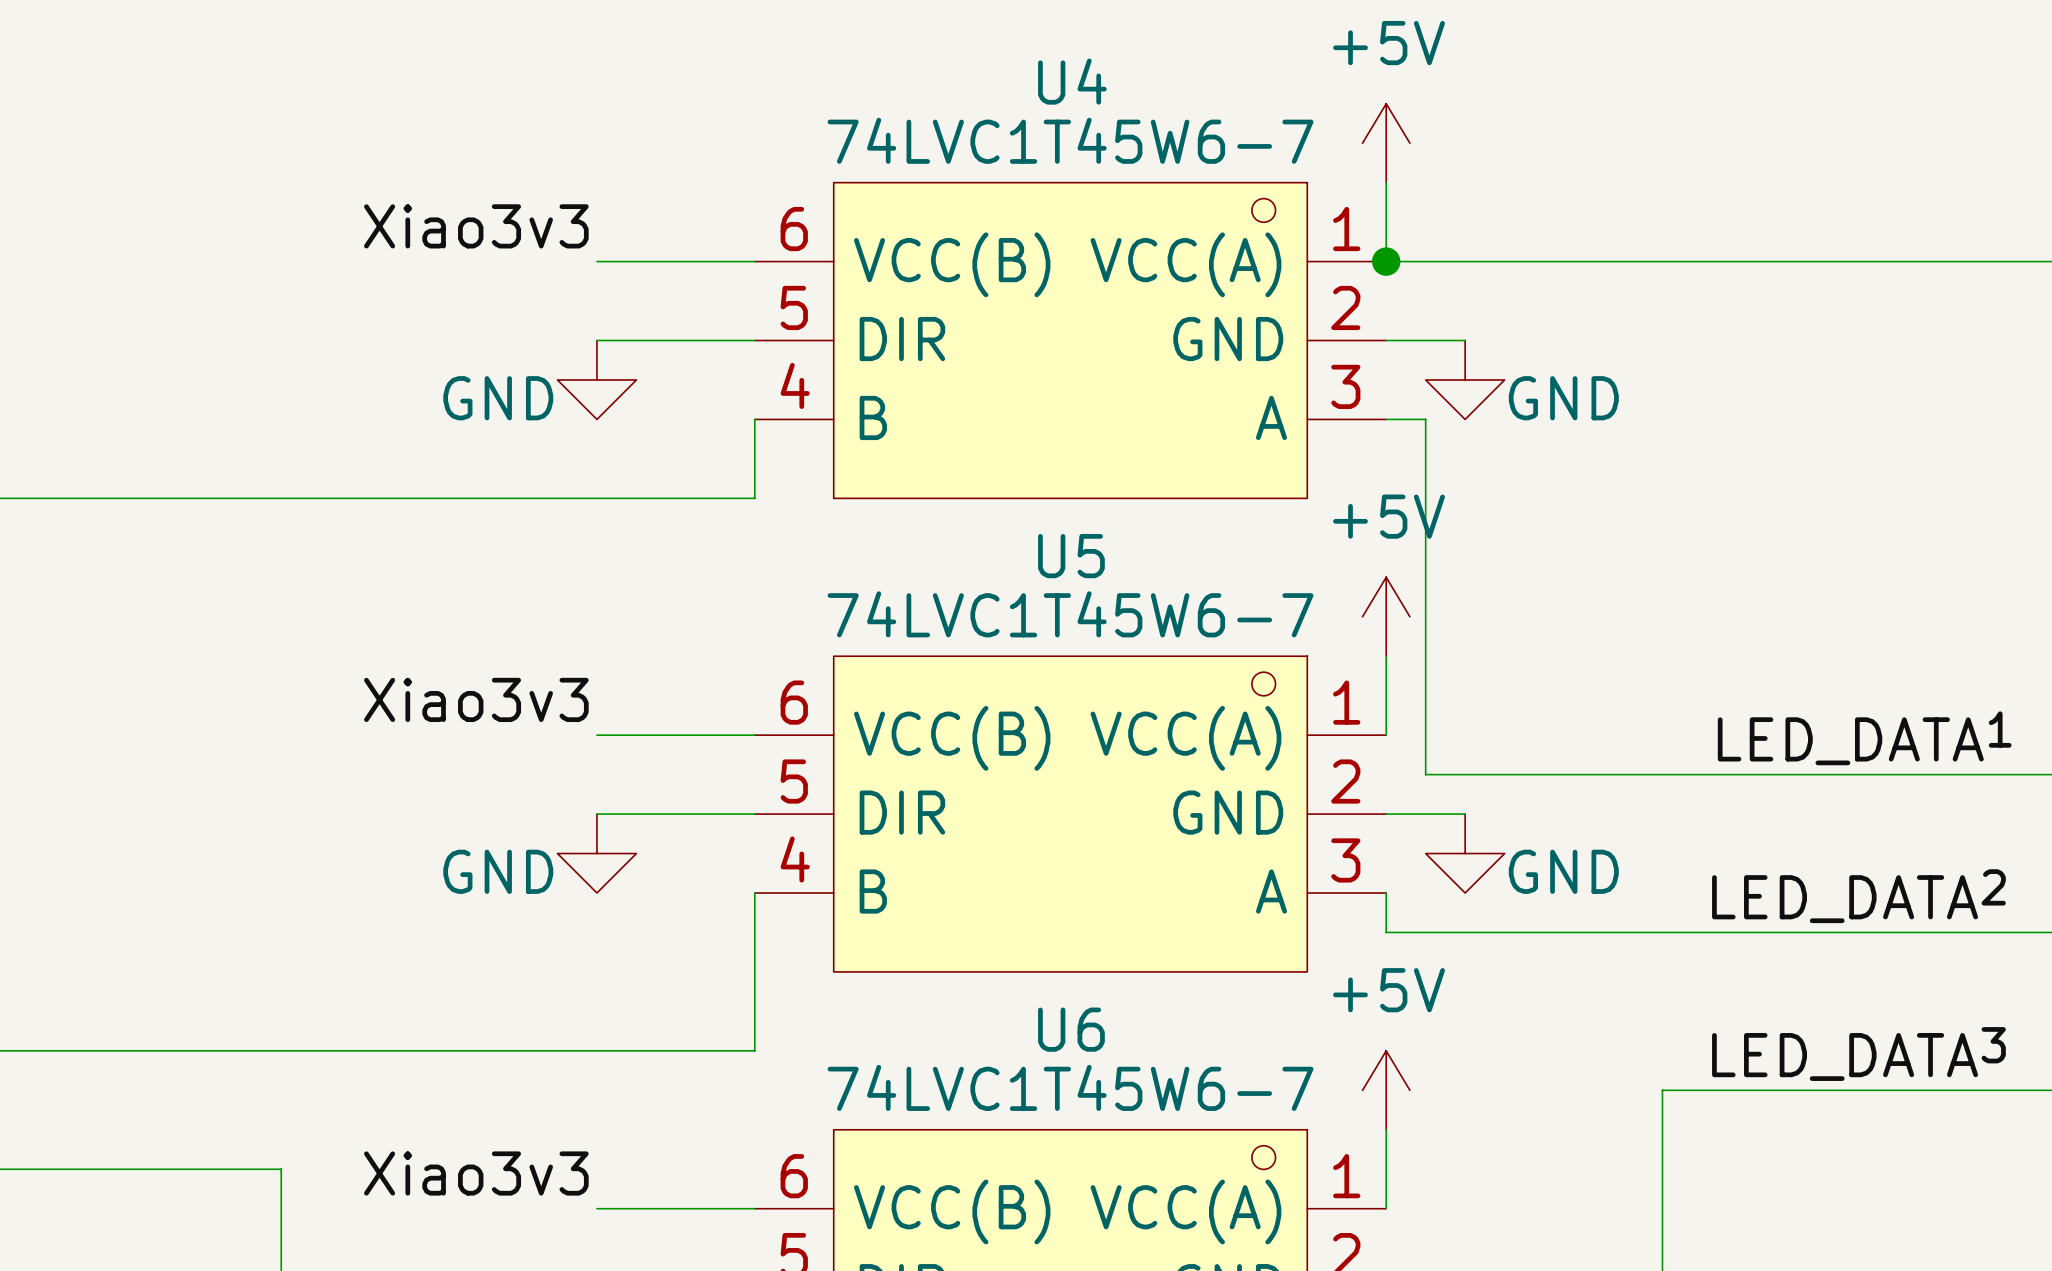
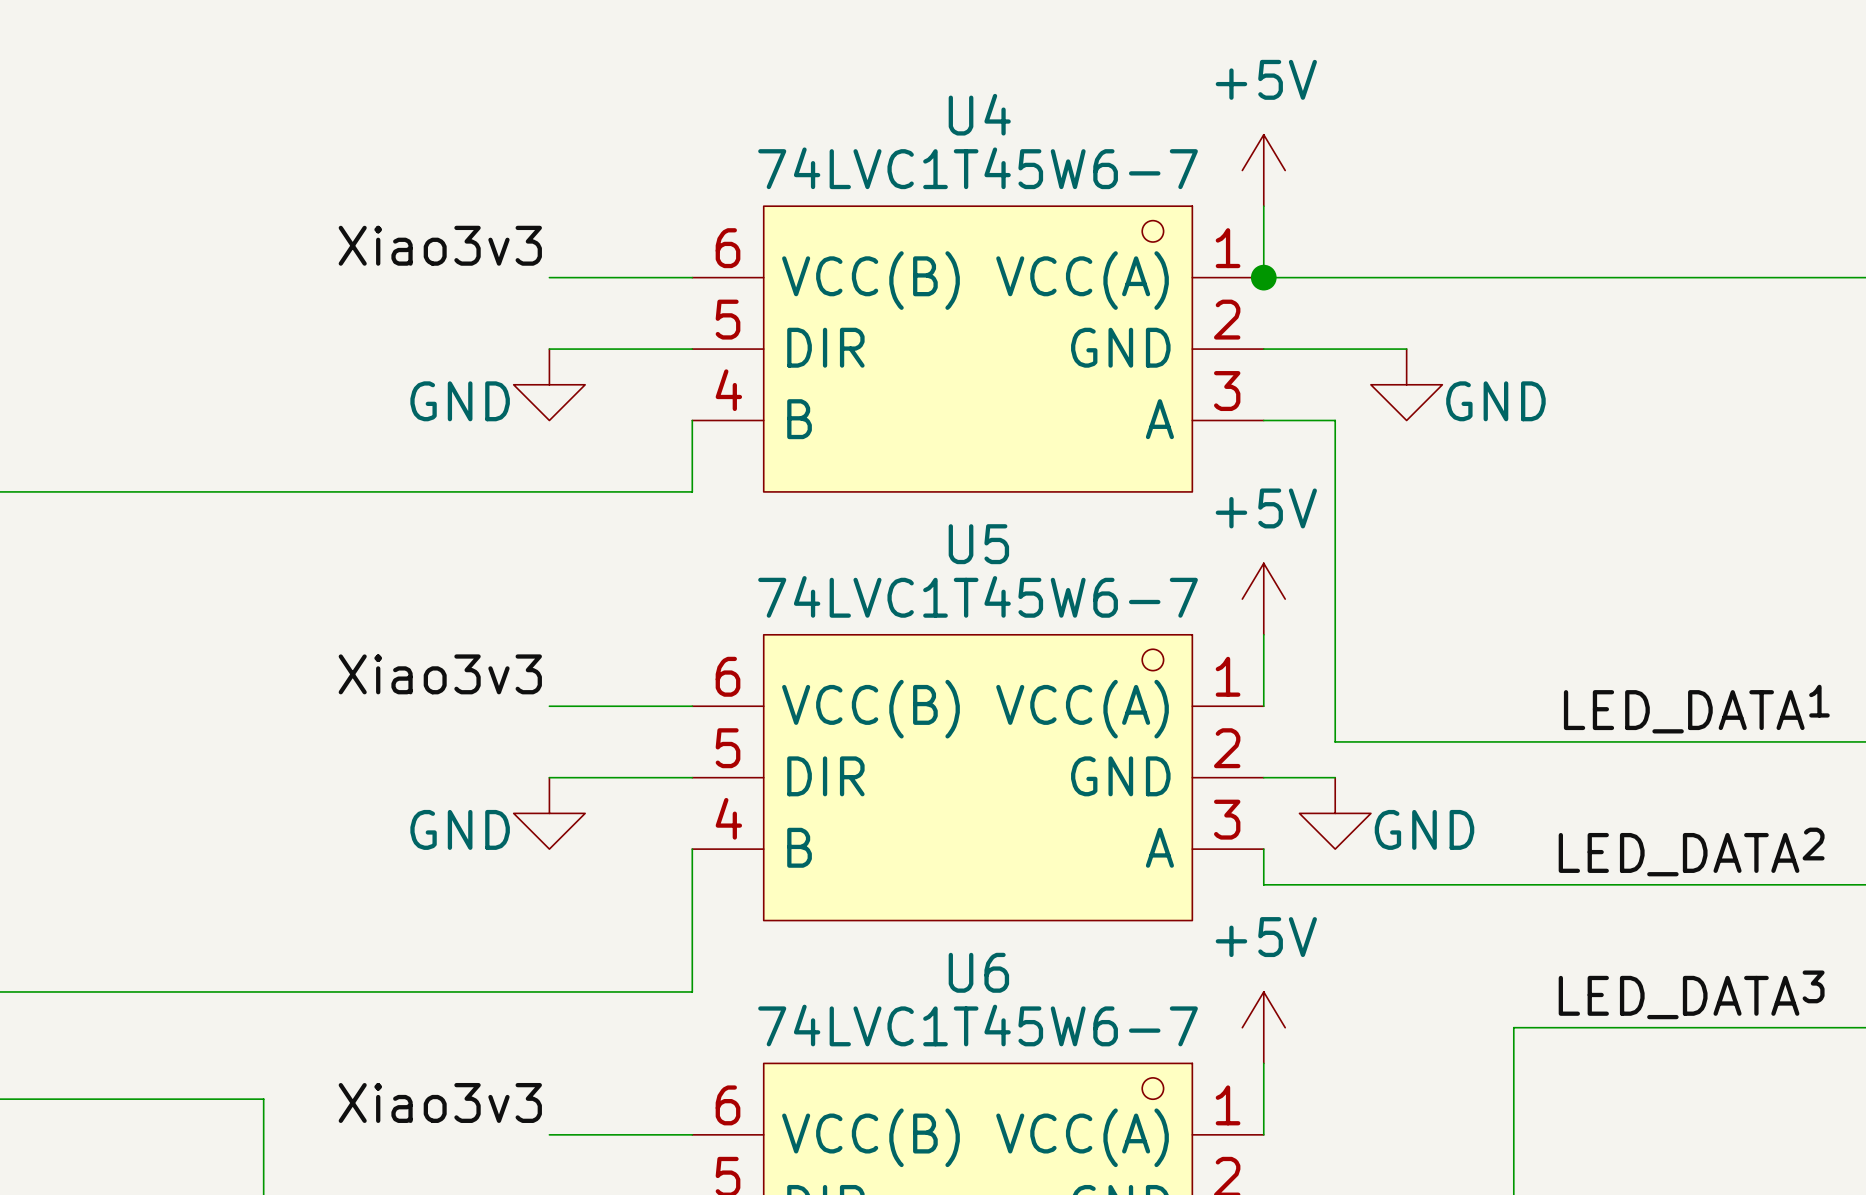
wire: none -> (1335, 349) (1406, 349)
power symbol position: GND (1465, 379) -> GND (1406, 384)
wire: (1425, 419) (1425, 774) (1465, 774) -> (1299, 420) (1335, 420) (1335, 741)

